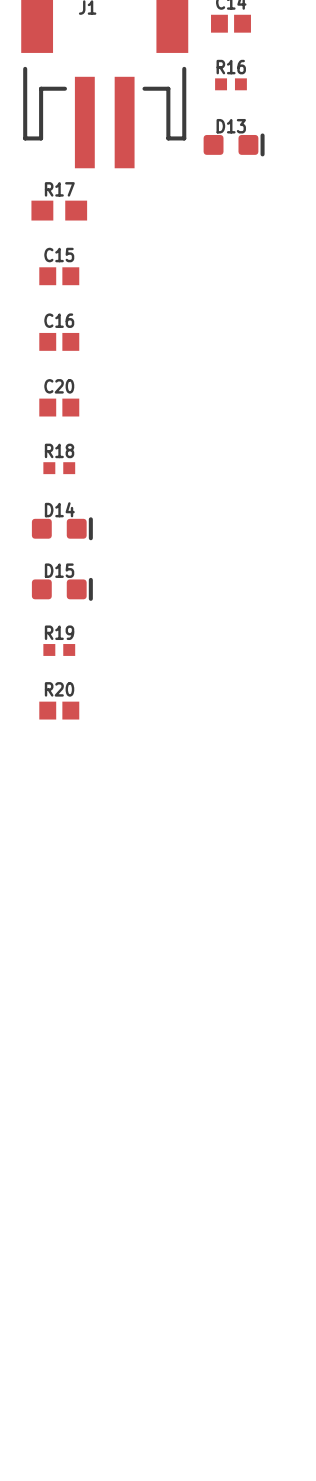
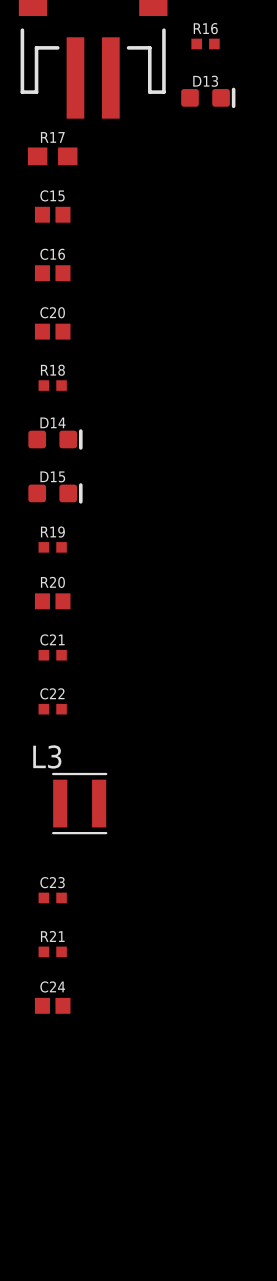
C21: none -> (52, 655)
C22: none -> (52, 709)
L3: none -> (79, 803)
C23: none -> (52, 897)
R21: none -> (52, 951)
C24: none -> (52, 1005)

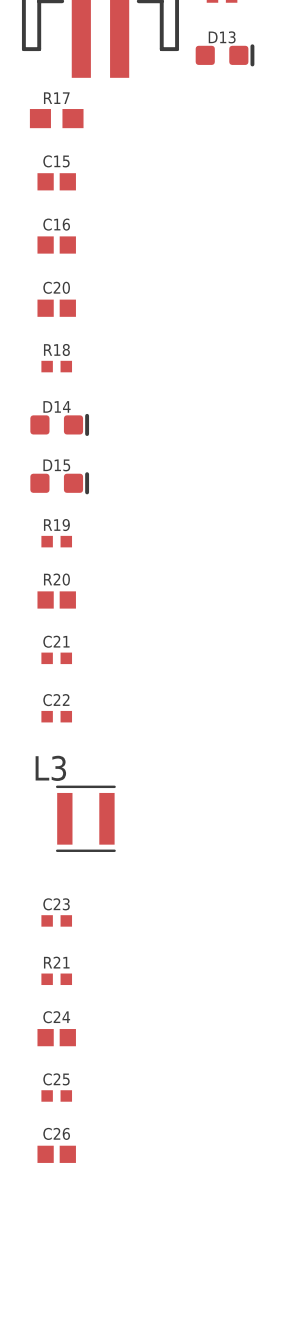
C25: none -> (56, 1095)
C26: none -> (56, 1154)

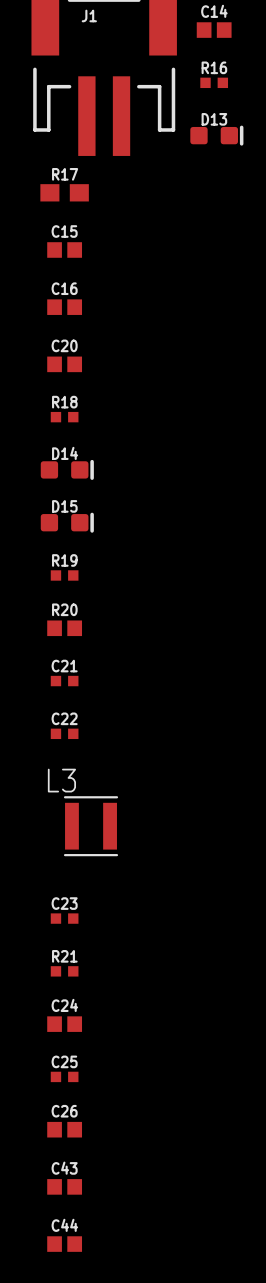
C43: none -> (64, 1186)
C44: none -> (64, 1244)

